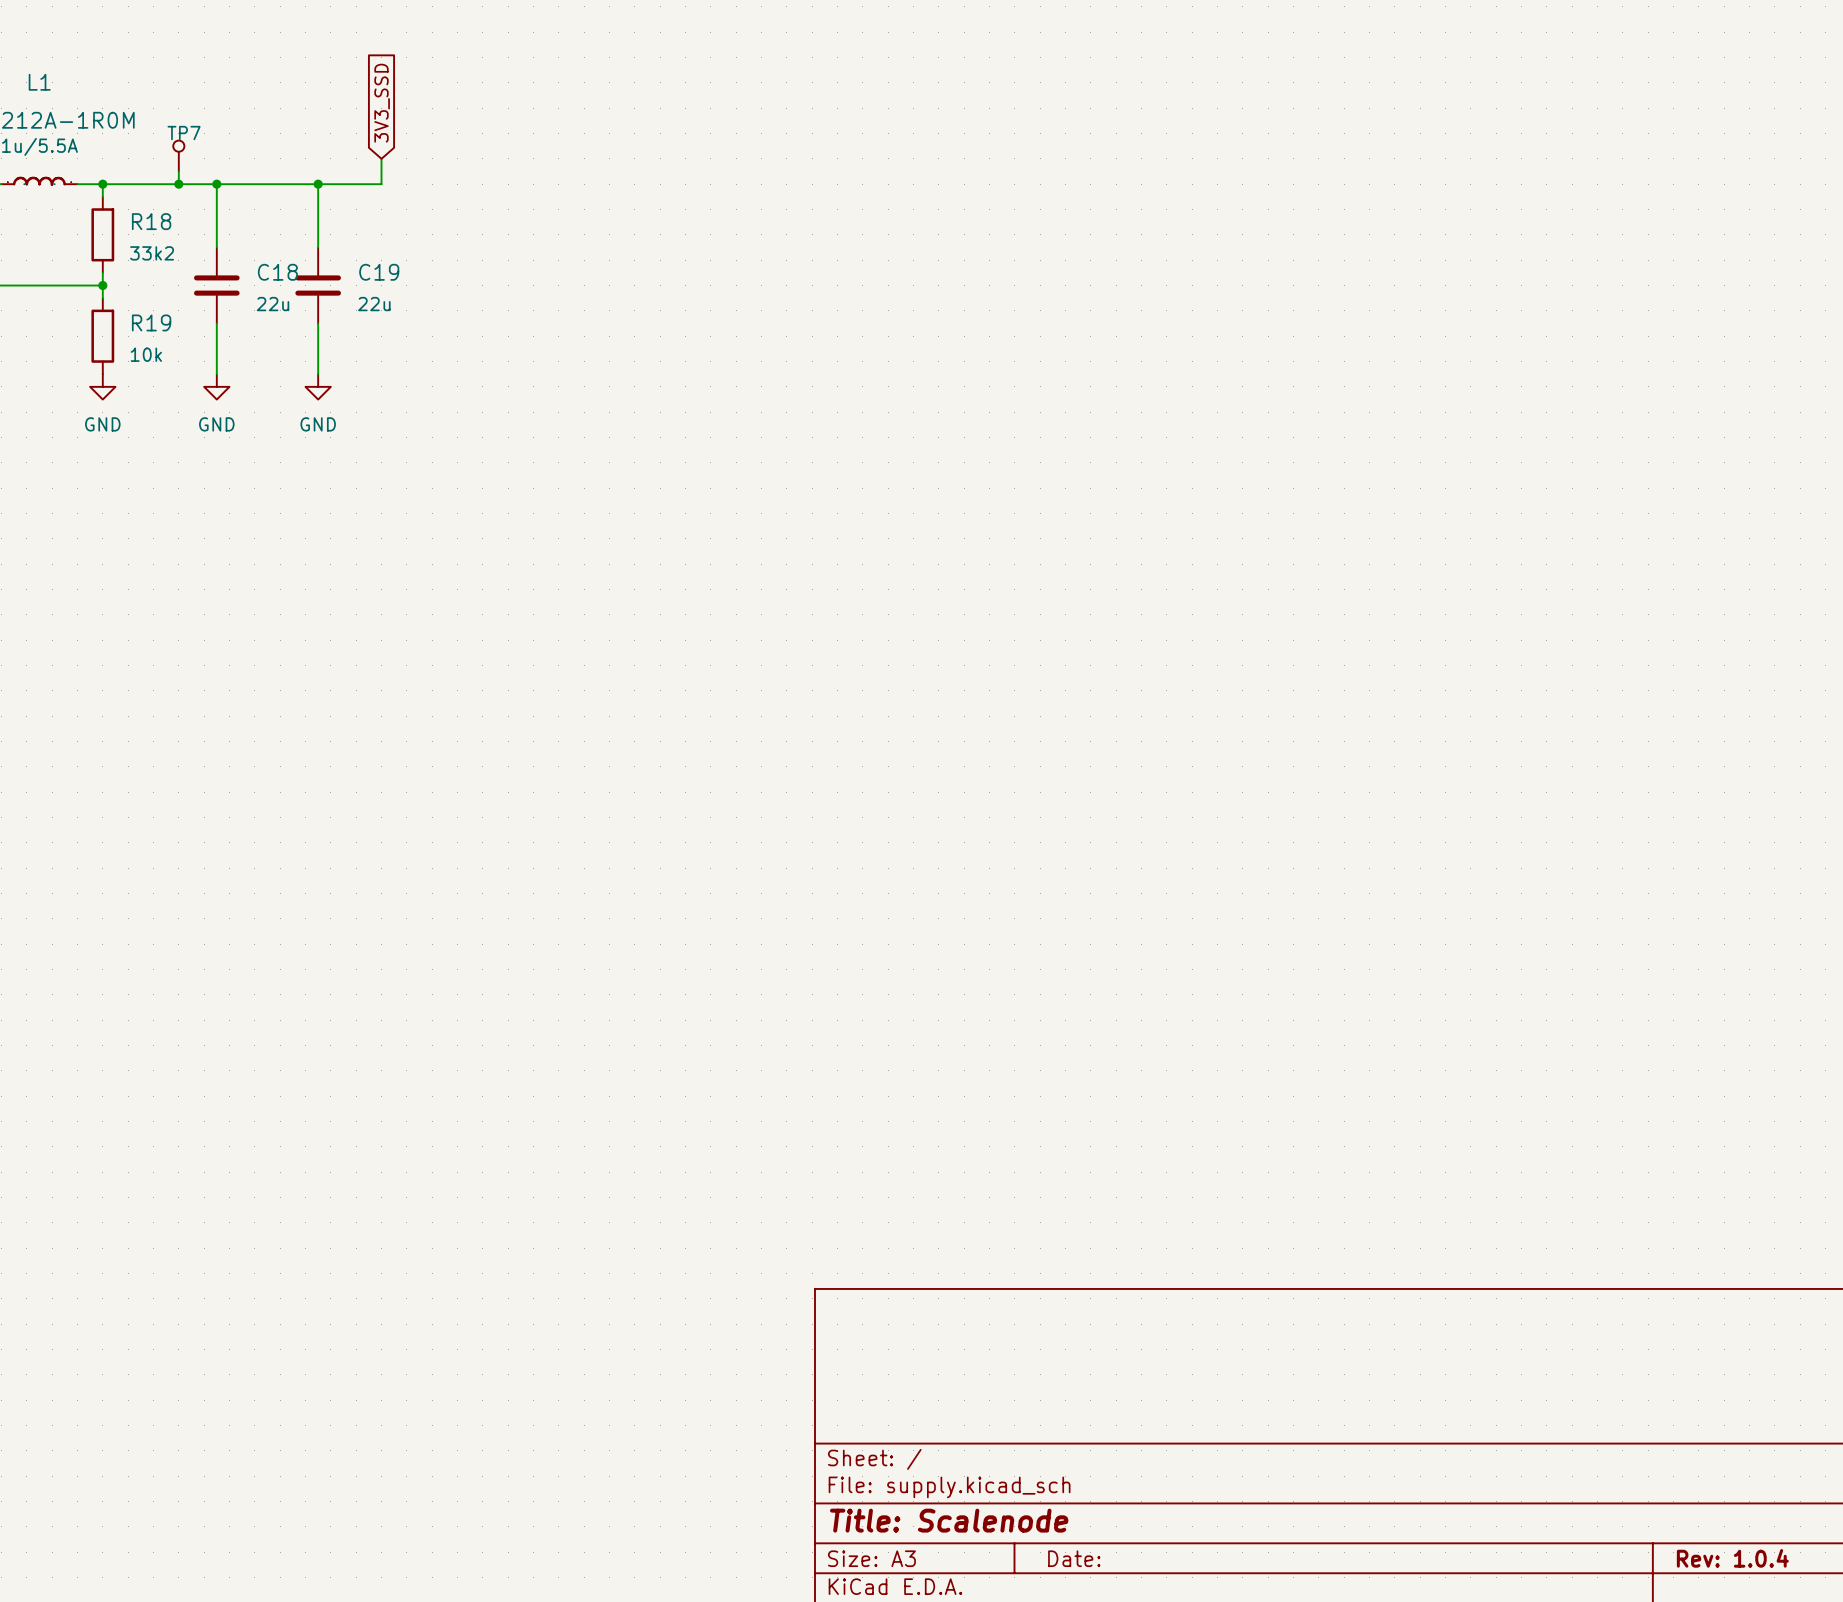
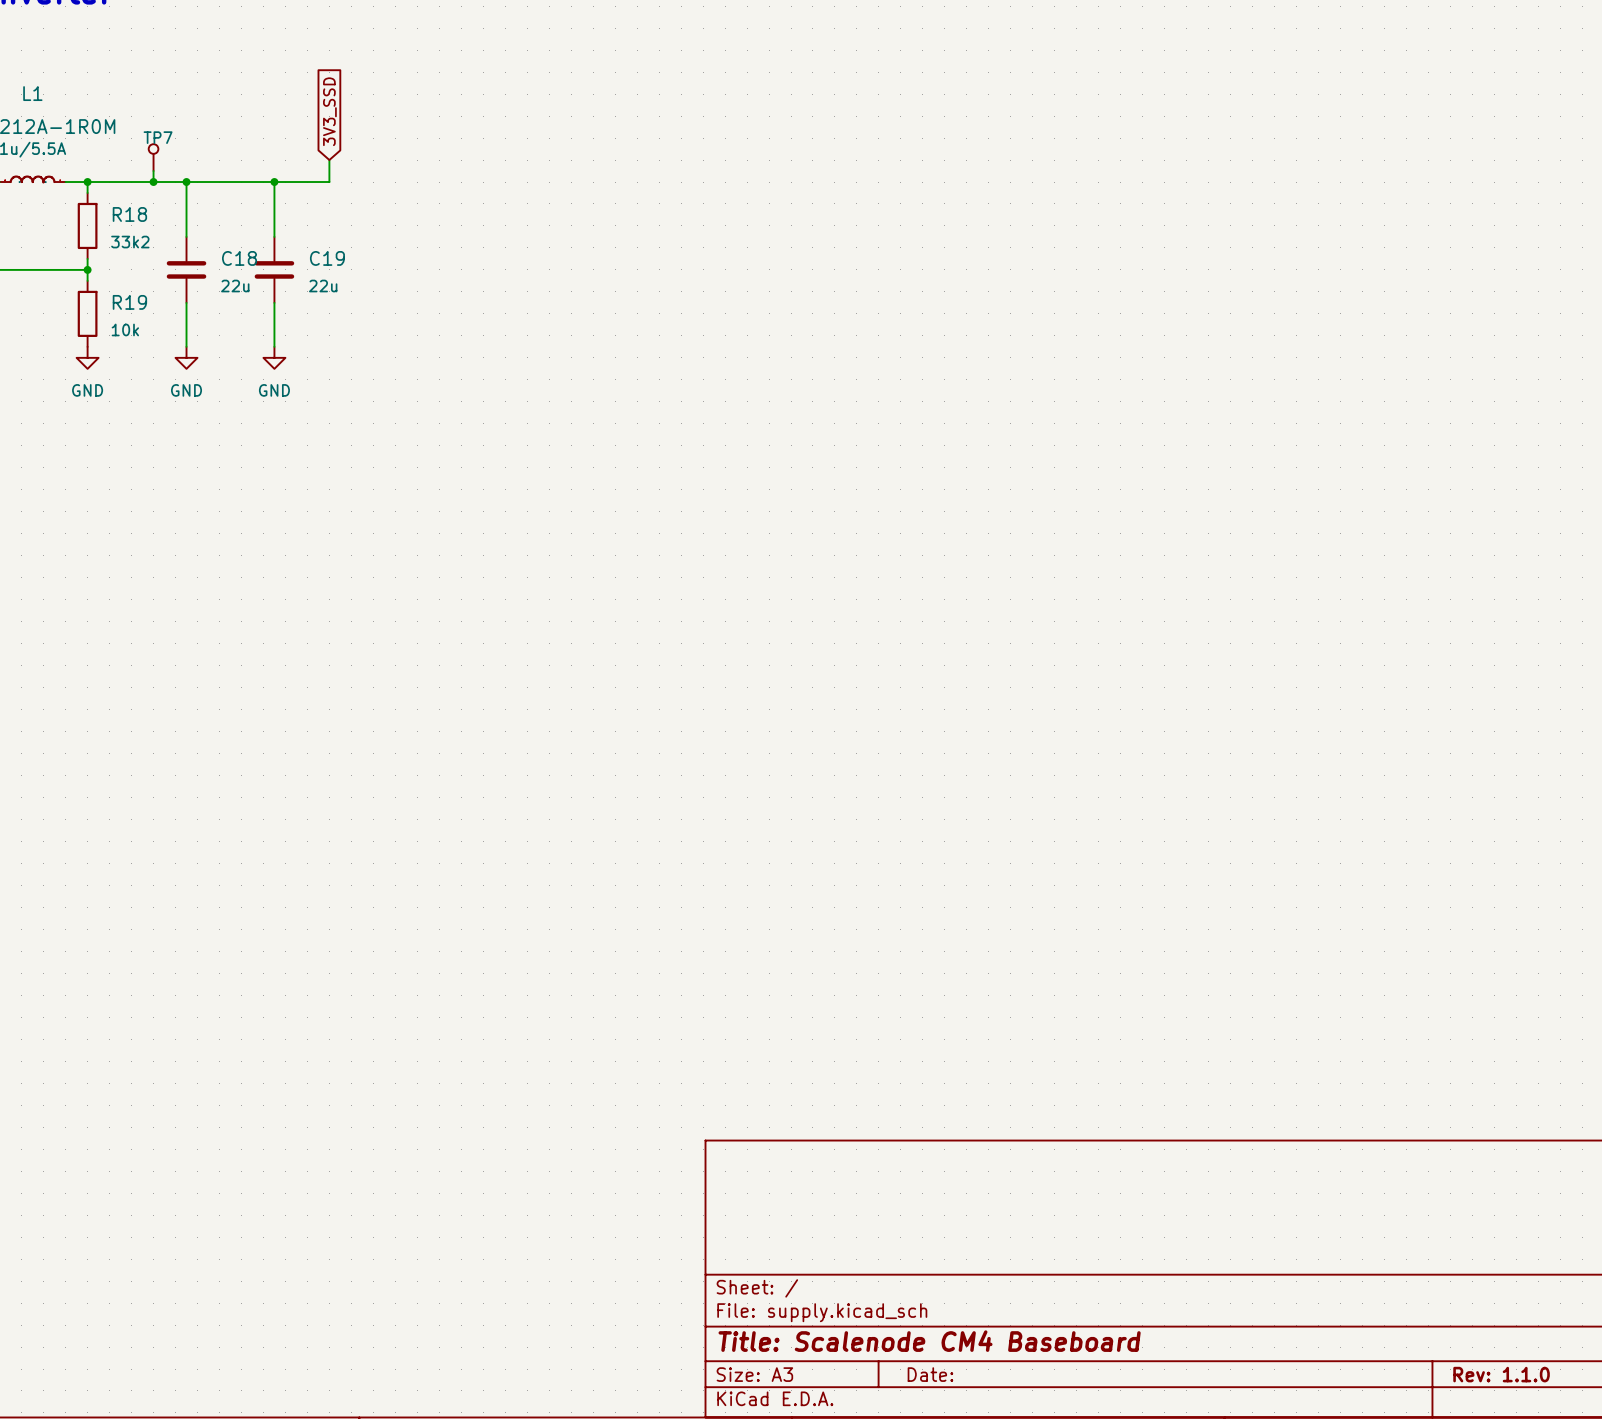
title block: Title: Scalenode (949, 1520) -> Title: Scalenode CM4 Baseboard (929, 1341)
title block: Rev: 1.0.4 (1732, 1558) -> Rev: 1.1.0 (1501, 1374)

